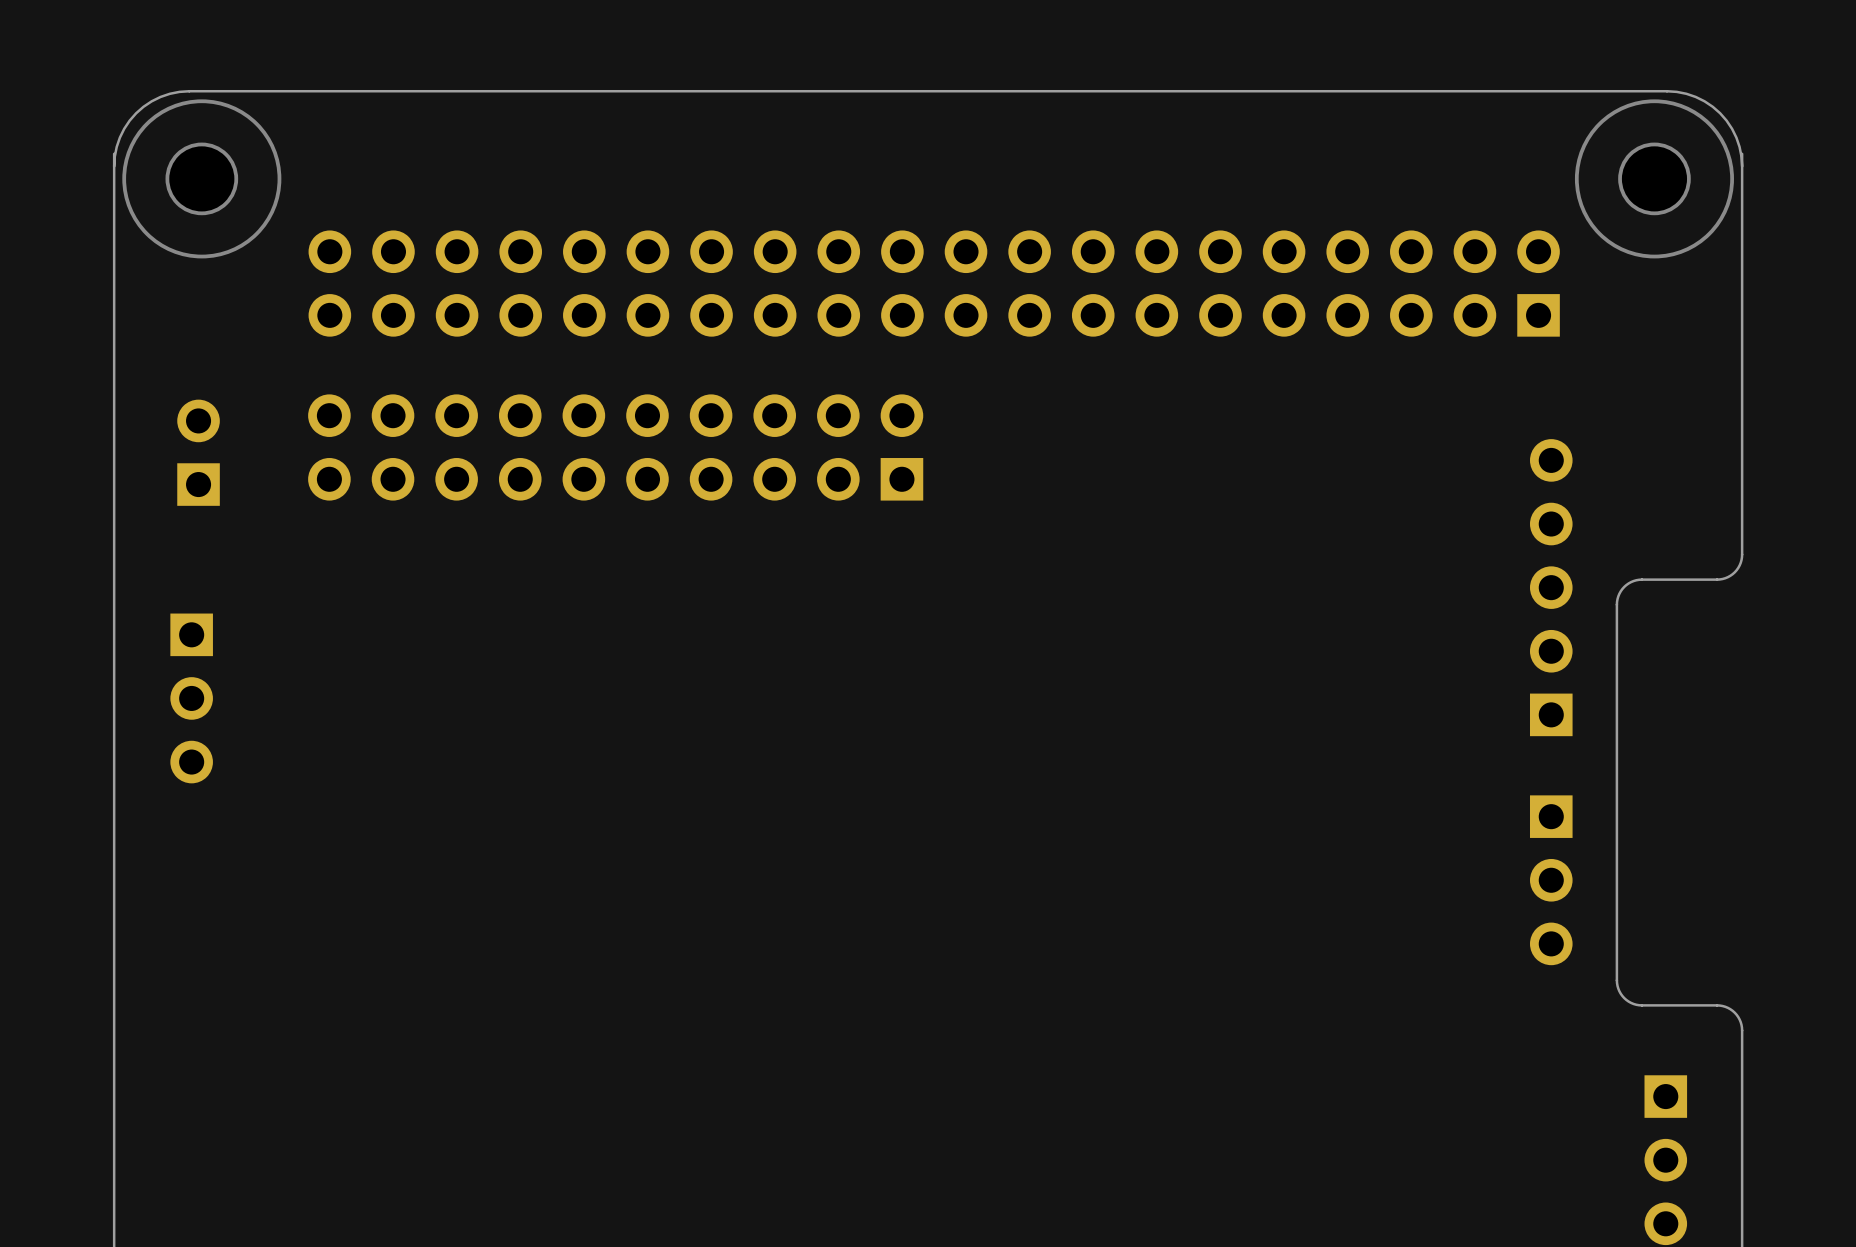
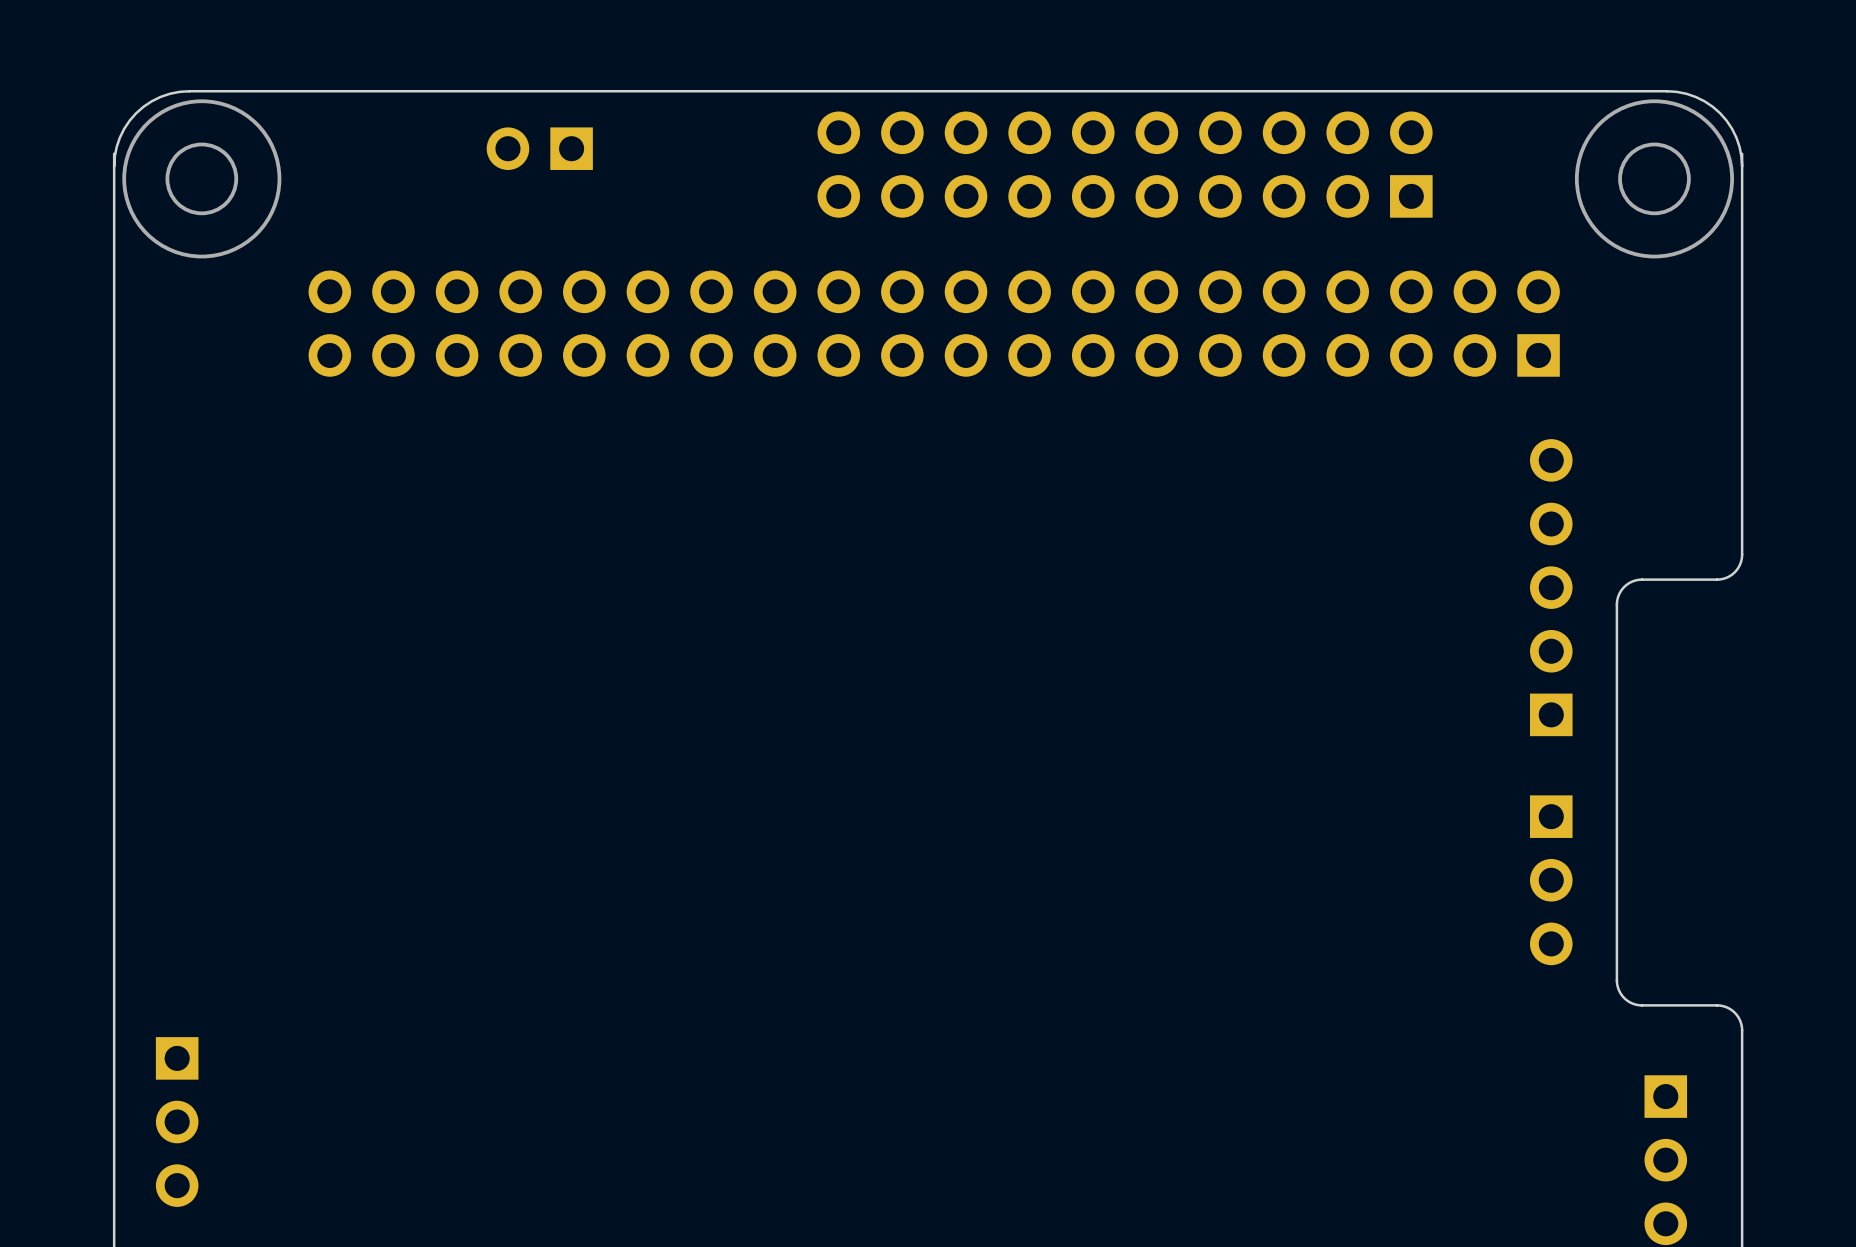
part position: (934, 283) -> (934, 323)
part position: (615, 447) -> (1125, 164)
part rotation: 0° (198, 452) -> 90° counterclockwise (539, 148)
part position: (198, 452) -> (539, 148)
part position: (191, 698) -> (177, 1122)

